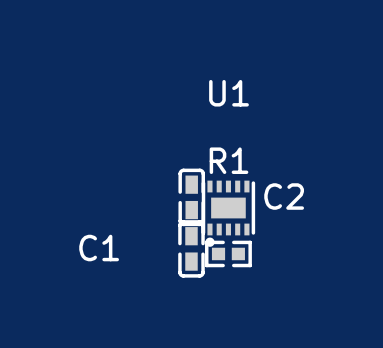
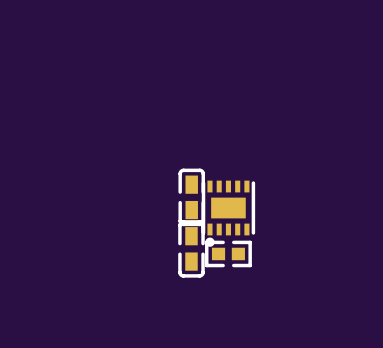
U1 name: U1 (229, 93) -> none
R1 name: R1 (229, 160) -> none
C2 name: C2 (284, 196) -> none
C1 name: C1 (99, 248) -> none

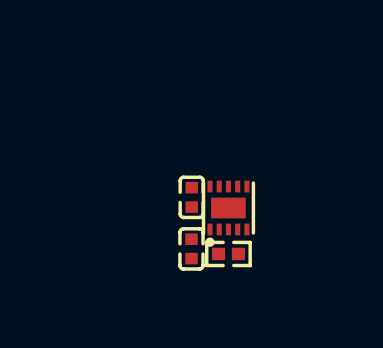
part footprint: [178, 168, 206, 227] -> [178, 175, 206, 220]
part footprint: [178, 220, 205, 278] -> [178, 227, 205, 271]

